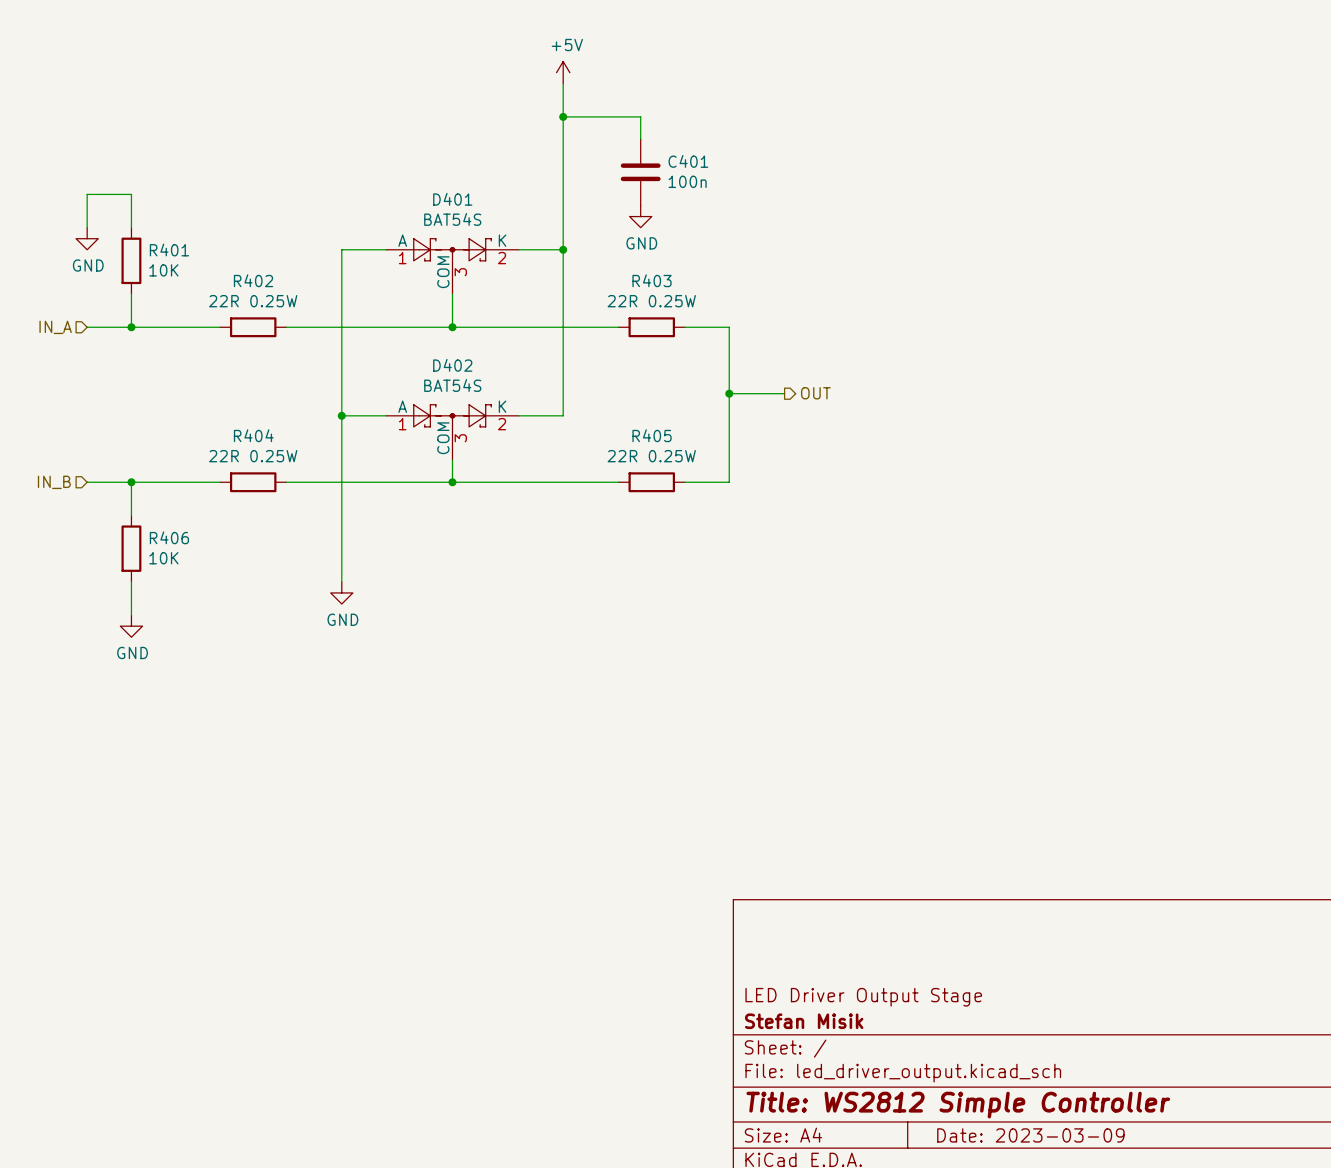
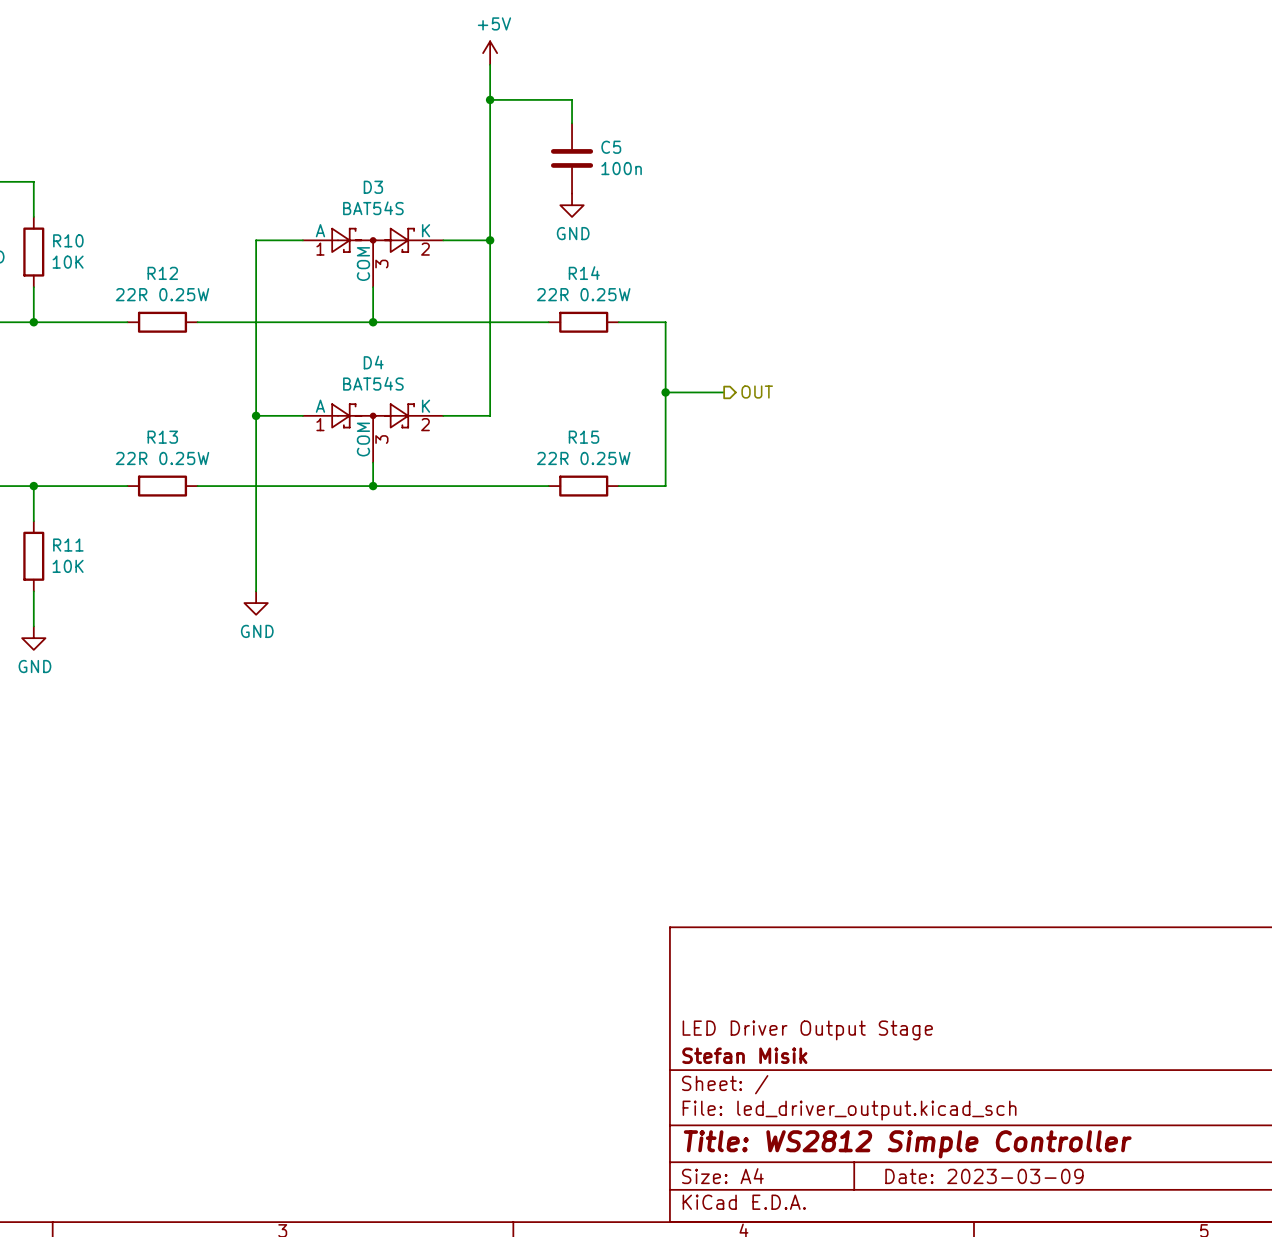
C401 name: C401 (688, 161) -> C5 (611, 147)
D401 name: D401 (452, 199) -> D3 (373, 187)
R401 name: R401 (169, 249) -> R10 (68, 240)
R402 name: R402 (253, 280) -> R12 (162, 273)
R403 name: R403 (652, 280) -> R14 (584, 273)
D402 name: D402 (452, 365) -> D4 (373, 362)
R404 name: R404 (253, 435) -> R13 (162, 437)
R405 name: R405 (652, 435) -> R15 (584, 437)
R406 name: R406 (169, 537) -> R11 (68, 545)

